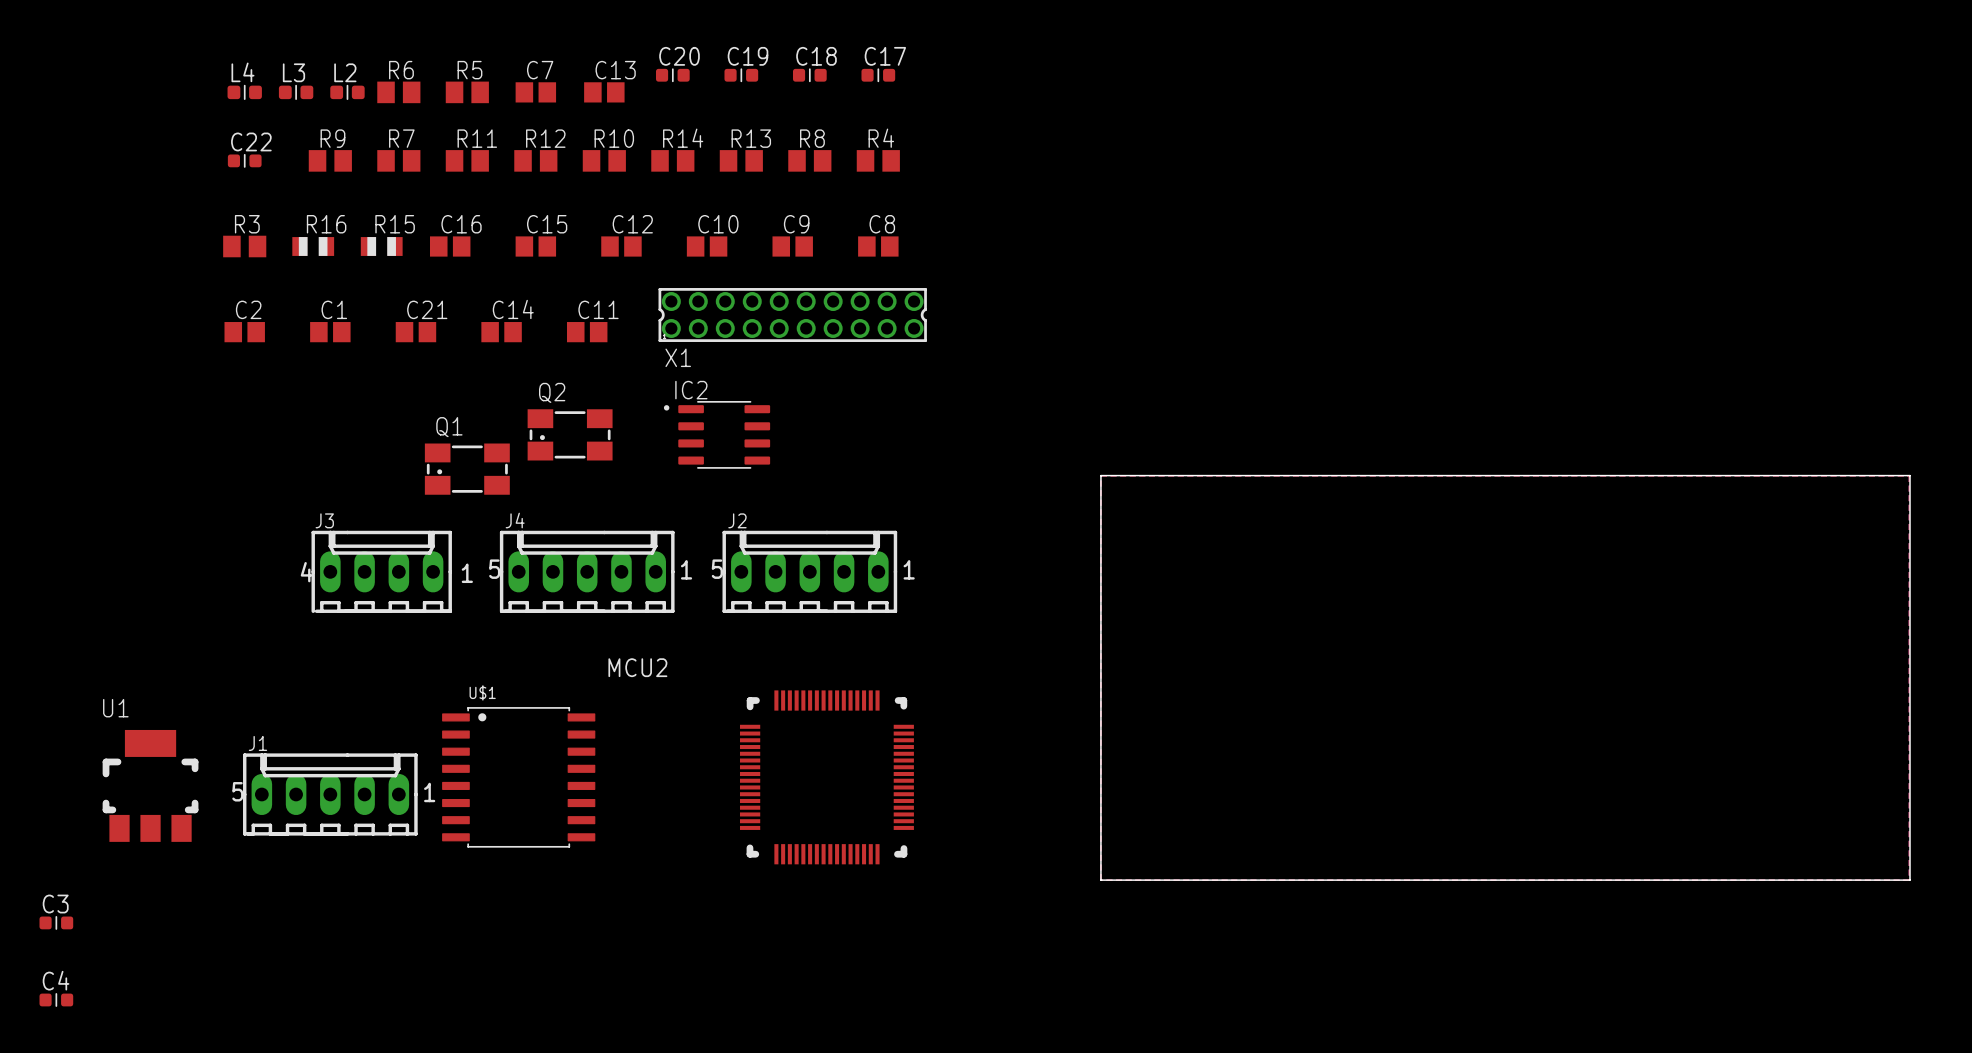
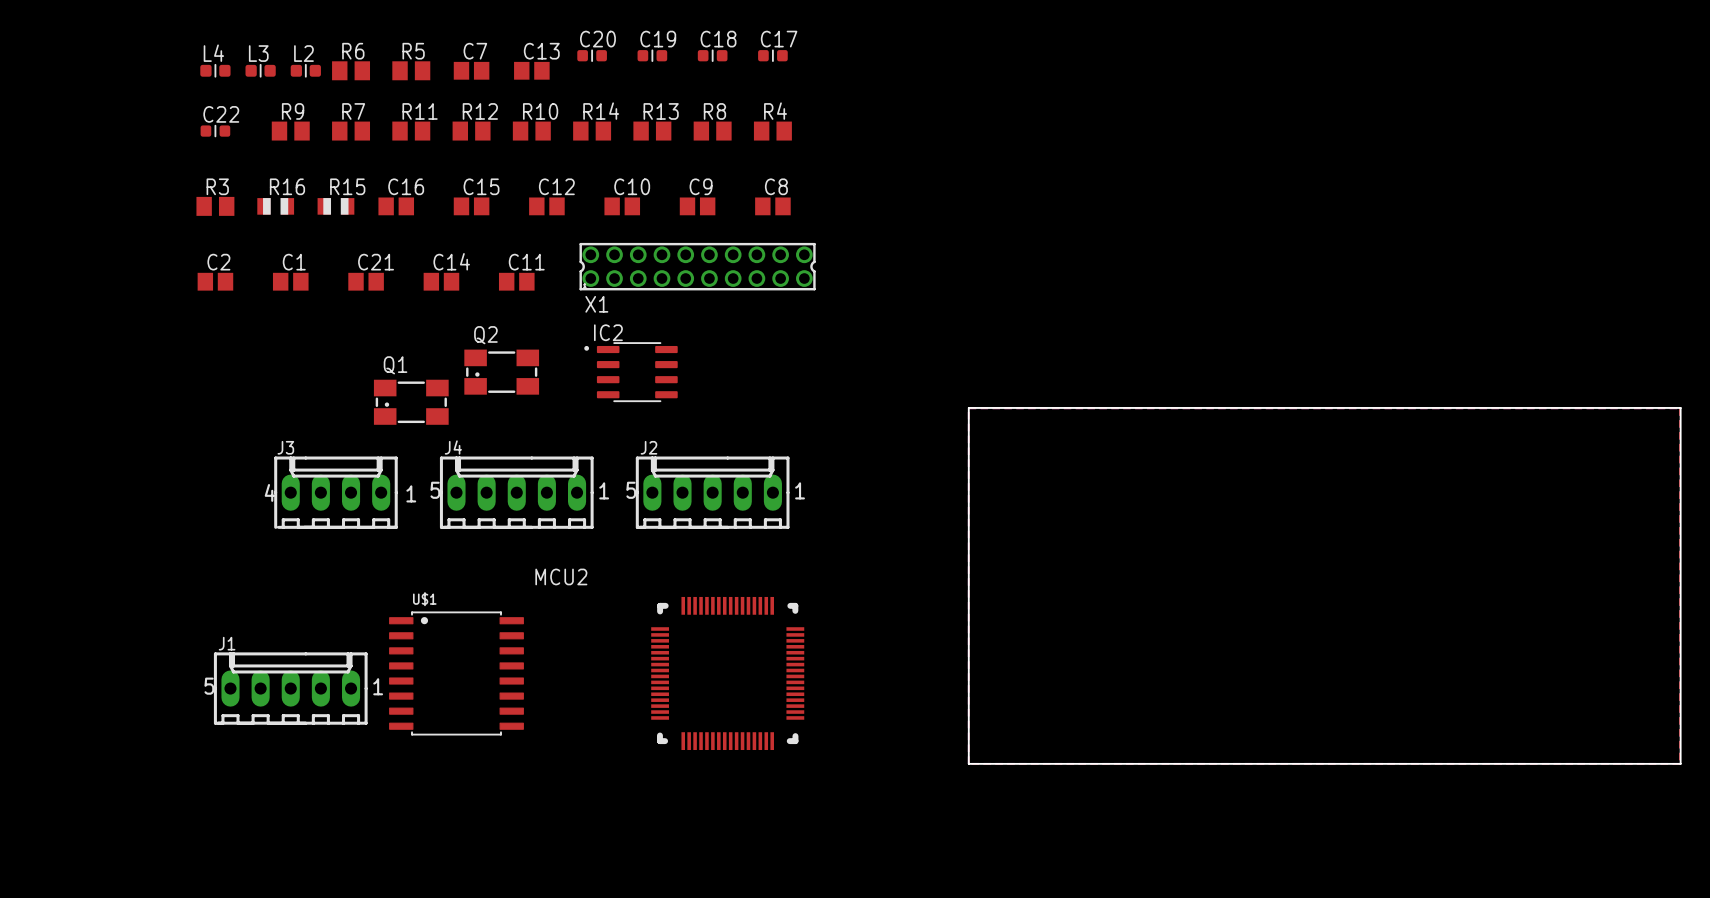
U1: (150, 785) -> none
C3: (56, 922) -> none
C4: (56, 999) -> none

